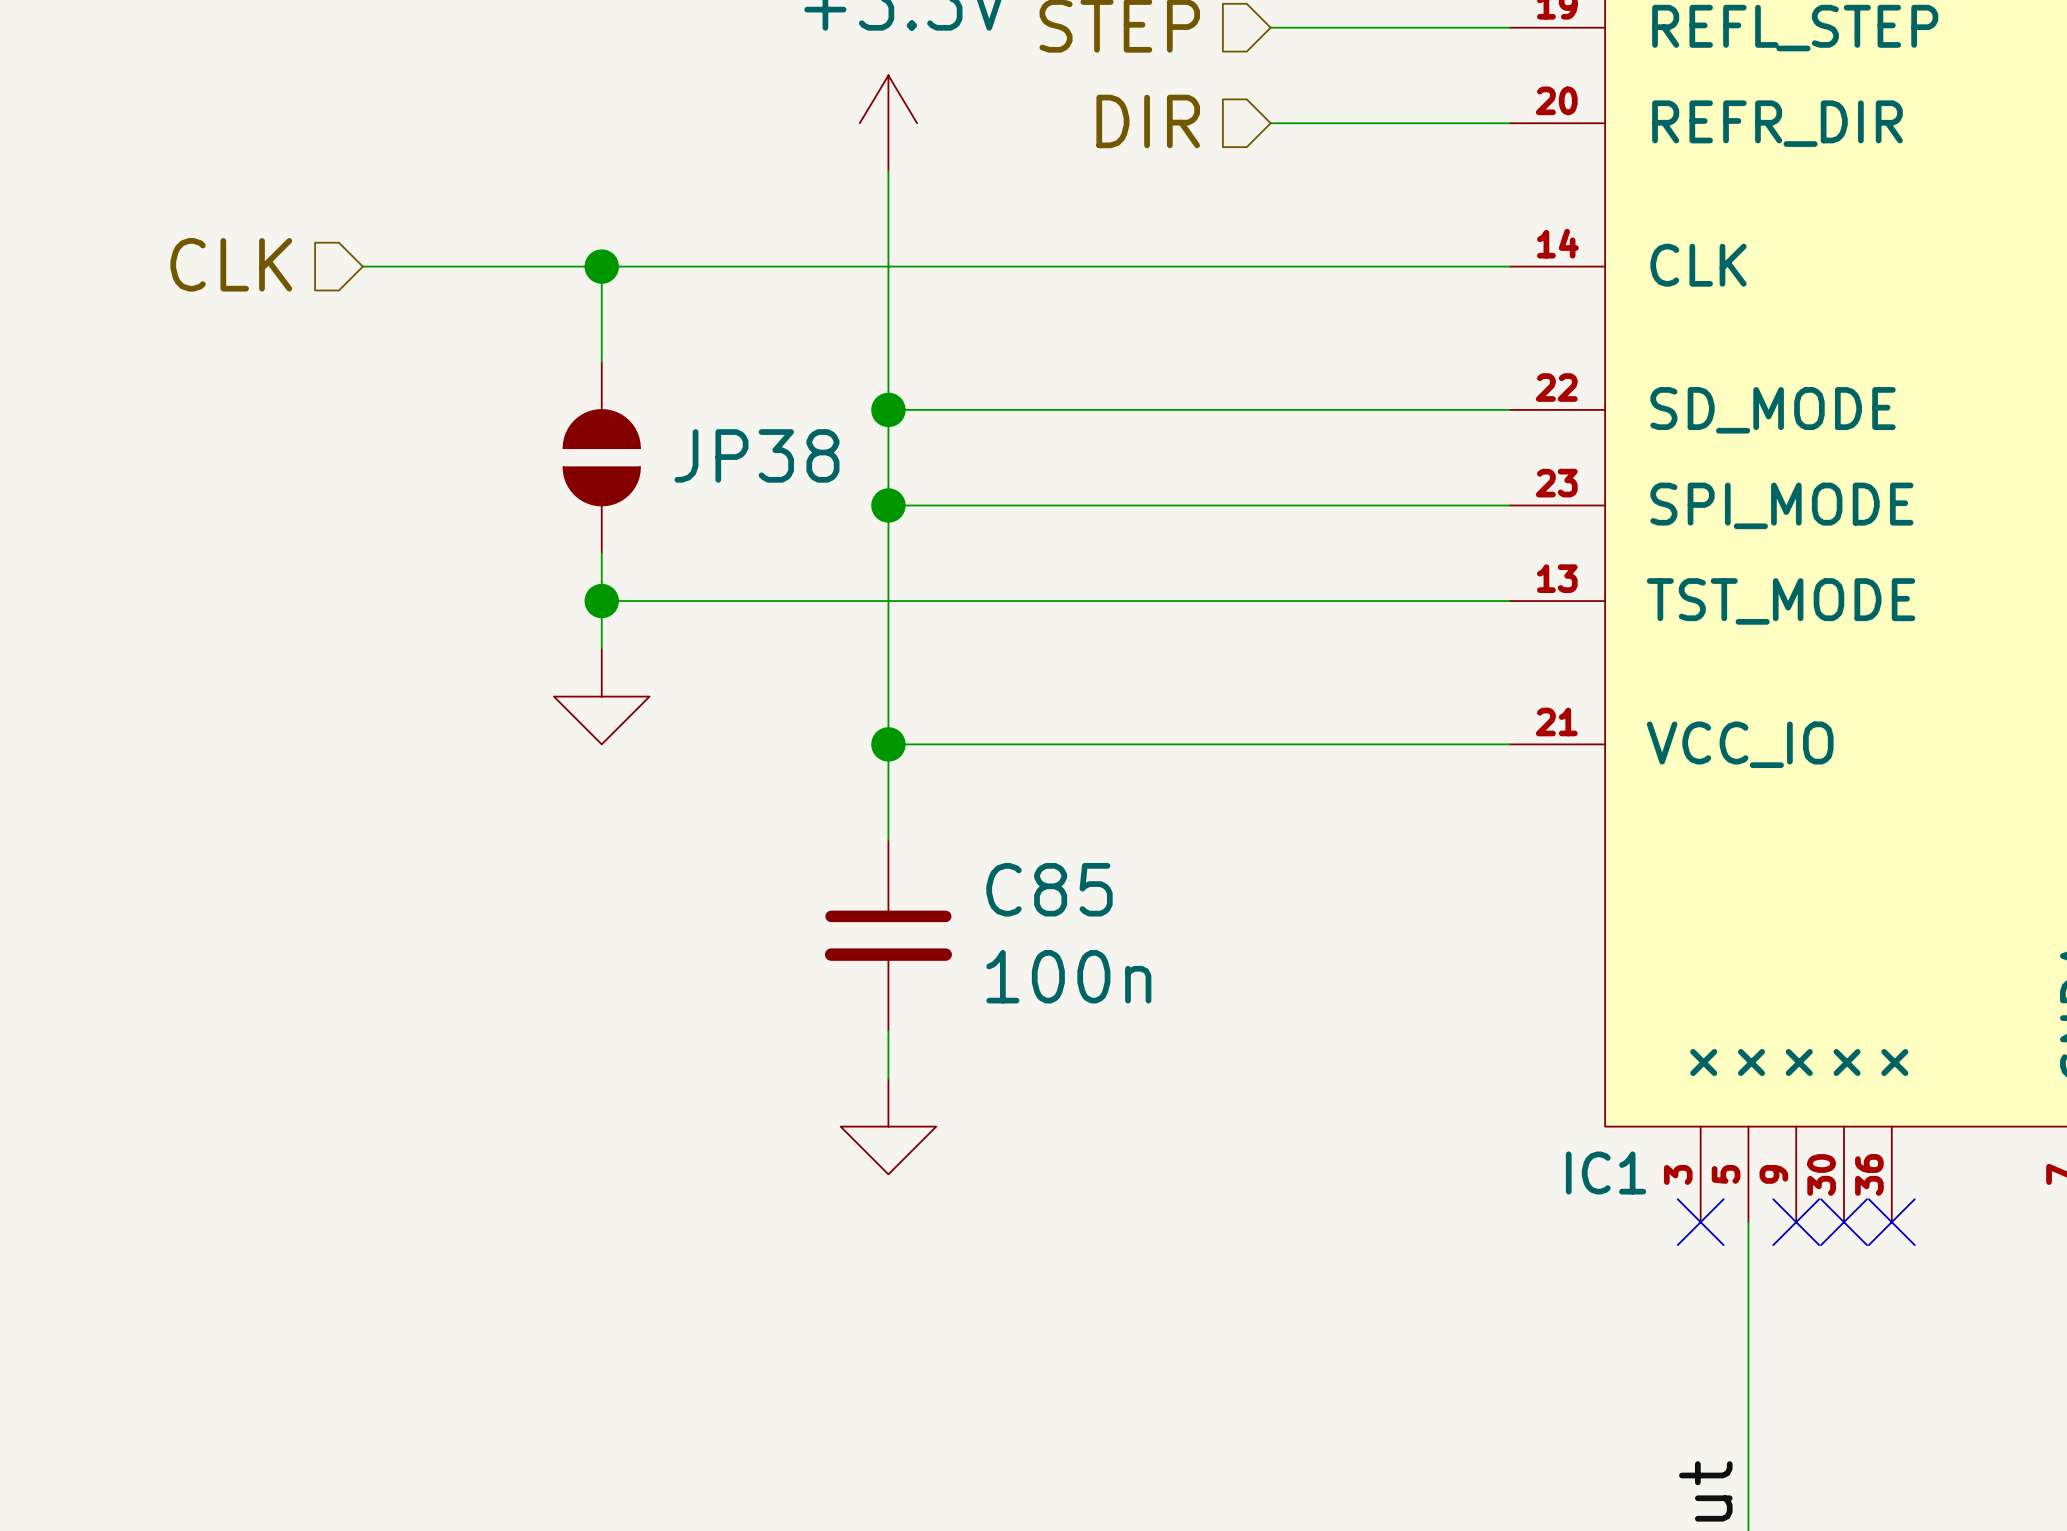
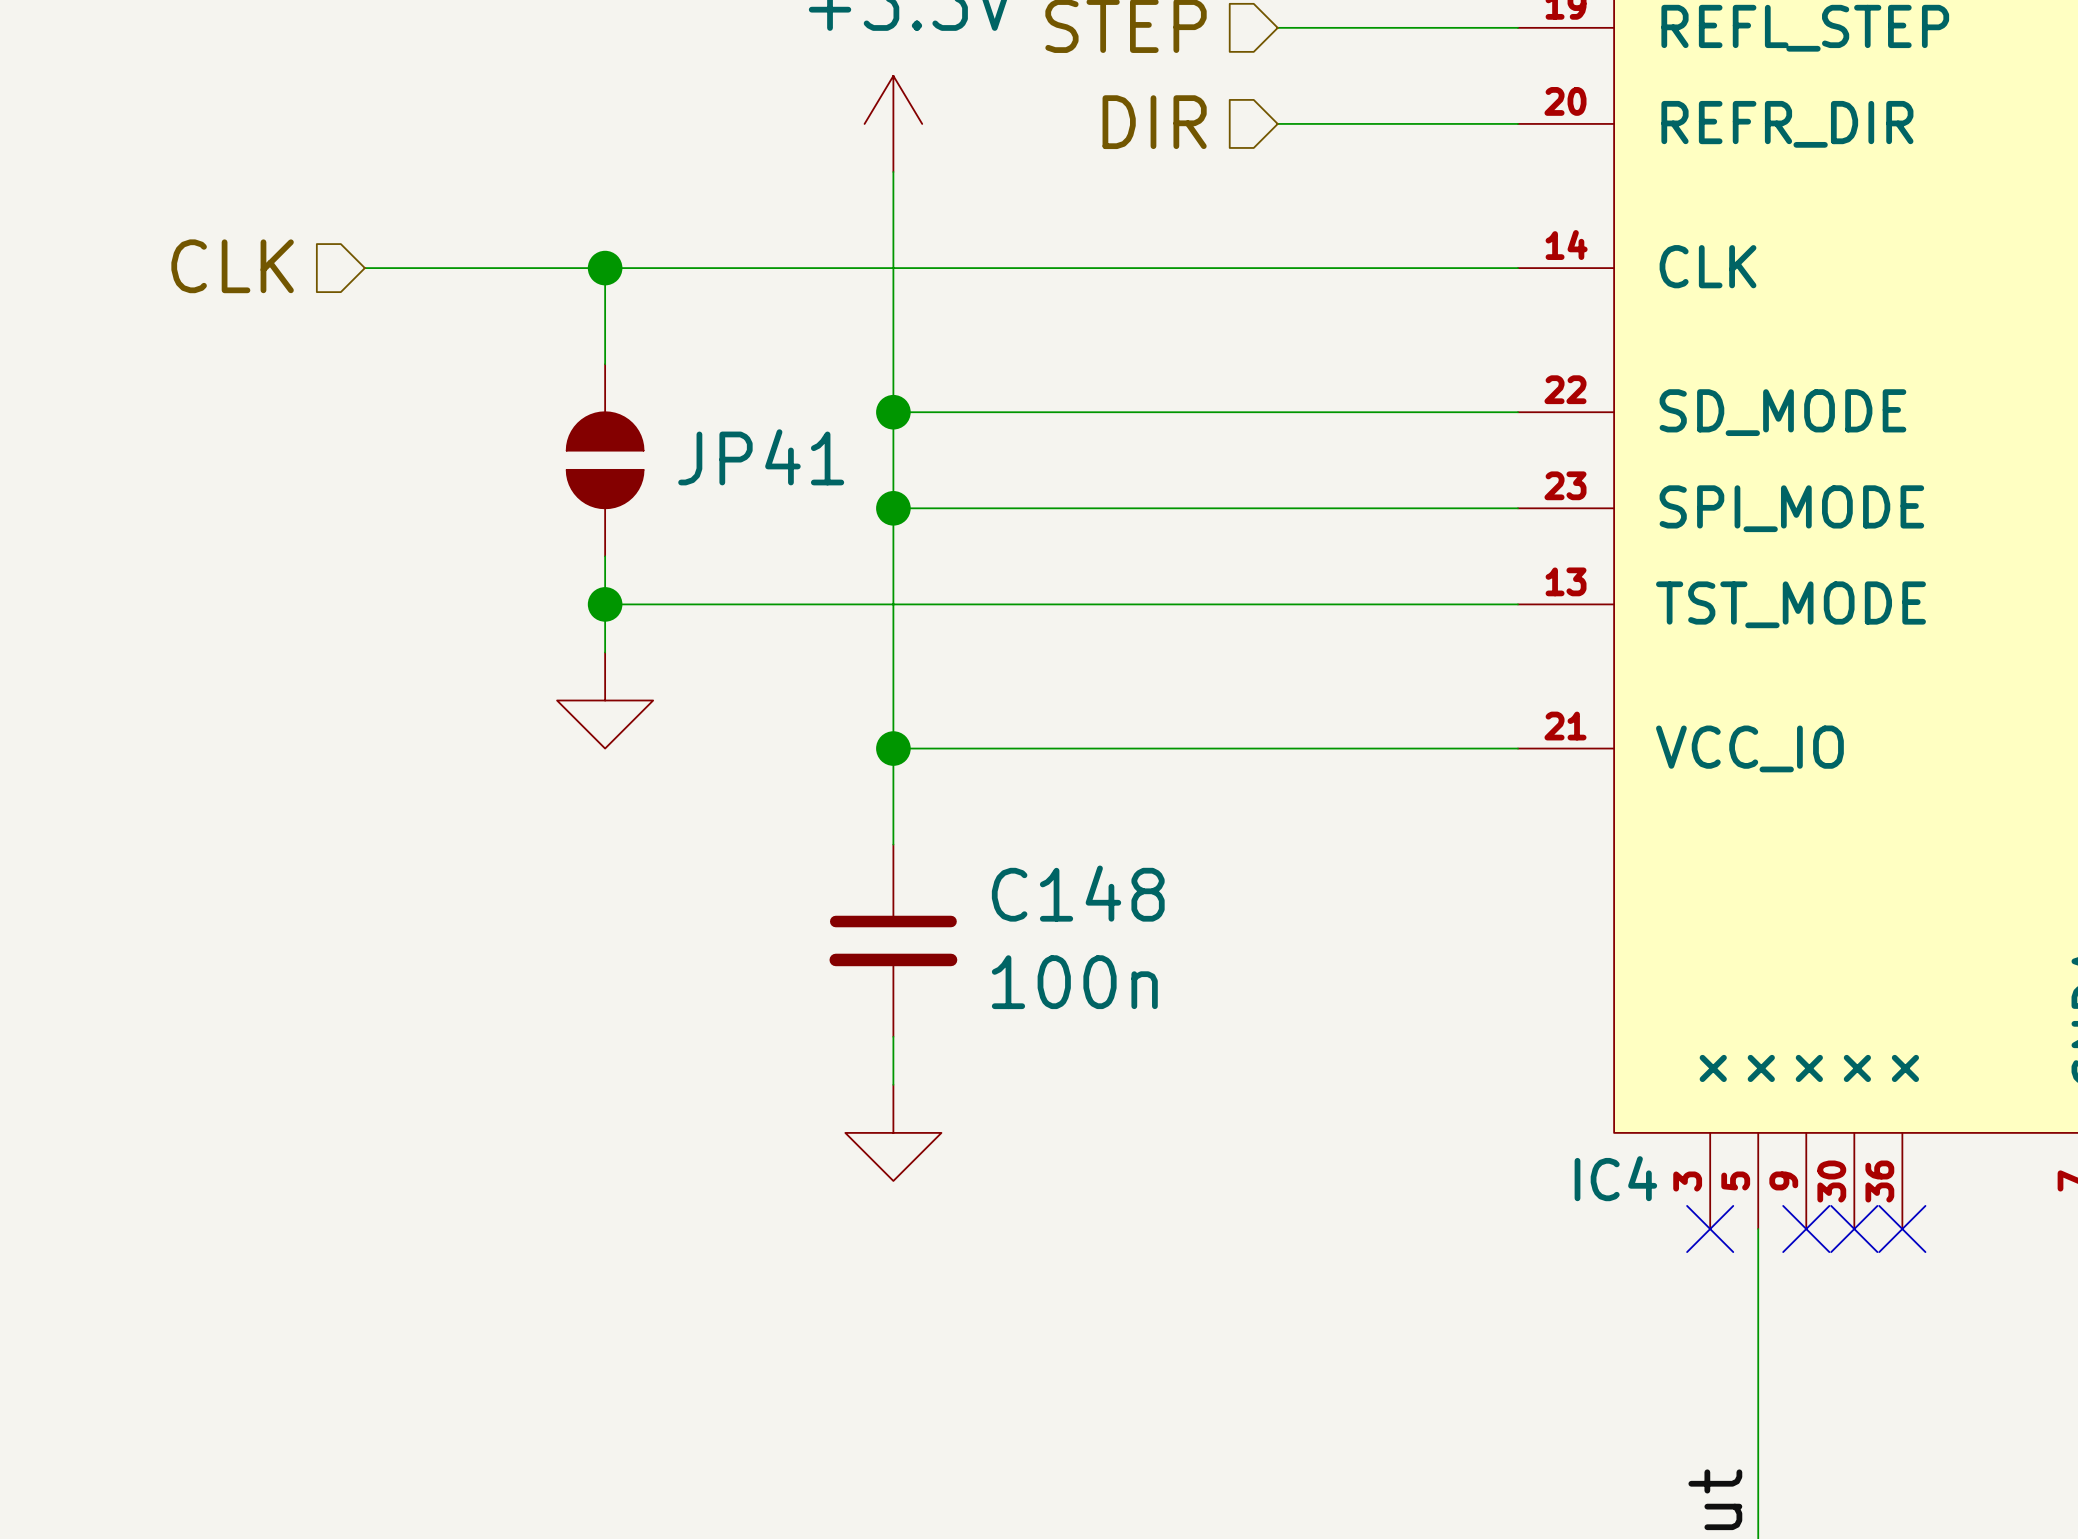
JP38 name: JP38 (756, 455) -> JP41 (761, 457)
C85 name: C85 (1049, 889) -> C148 (1078, 893)
IC1 name: IC1 (1606, 1173) -> IC4 (1615, 1178)

